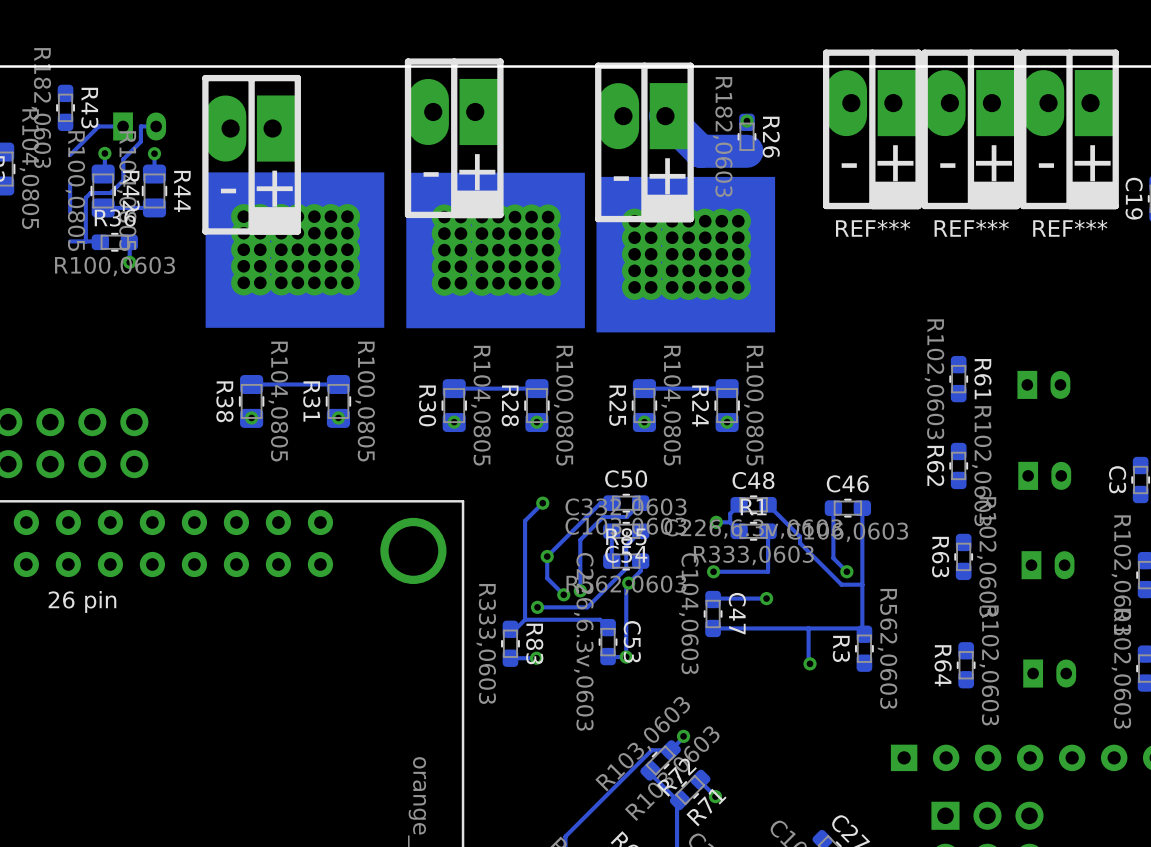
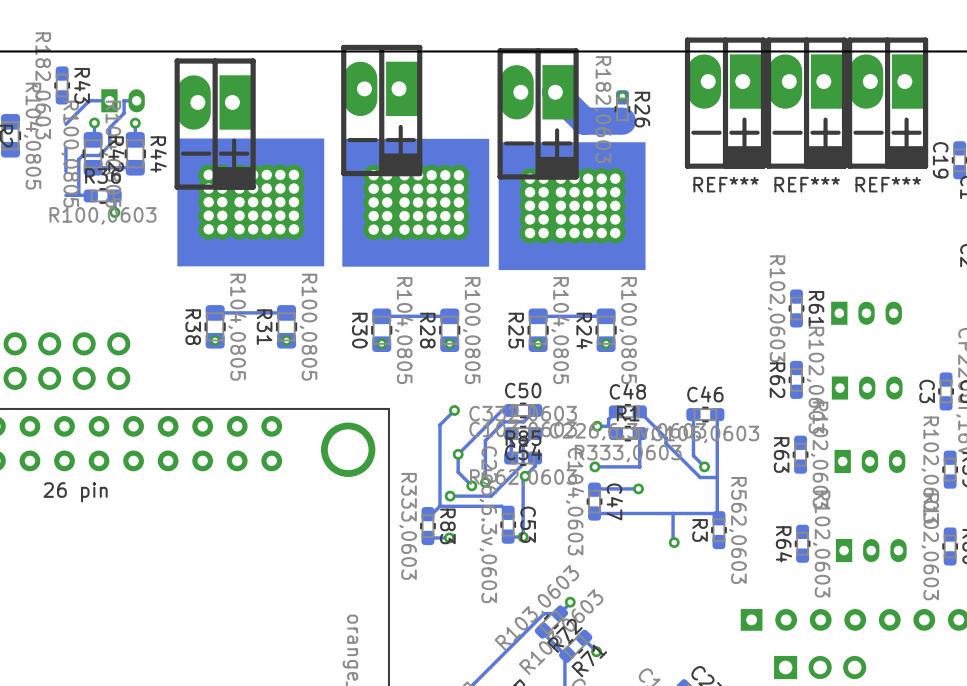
part footprint: [1017, 370, 1071, 399] -> [831, 301, 902, 325]
part footprint: [1018, 461, 1072, 490] -> [831, 376, 903, 400]
part footprint: [1021, 551, 1075, 580] -> [834, 449, 906, 474]
part footprint: [1023, 659, 1077, 688] -> [835, 538, 907, 563]

